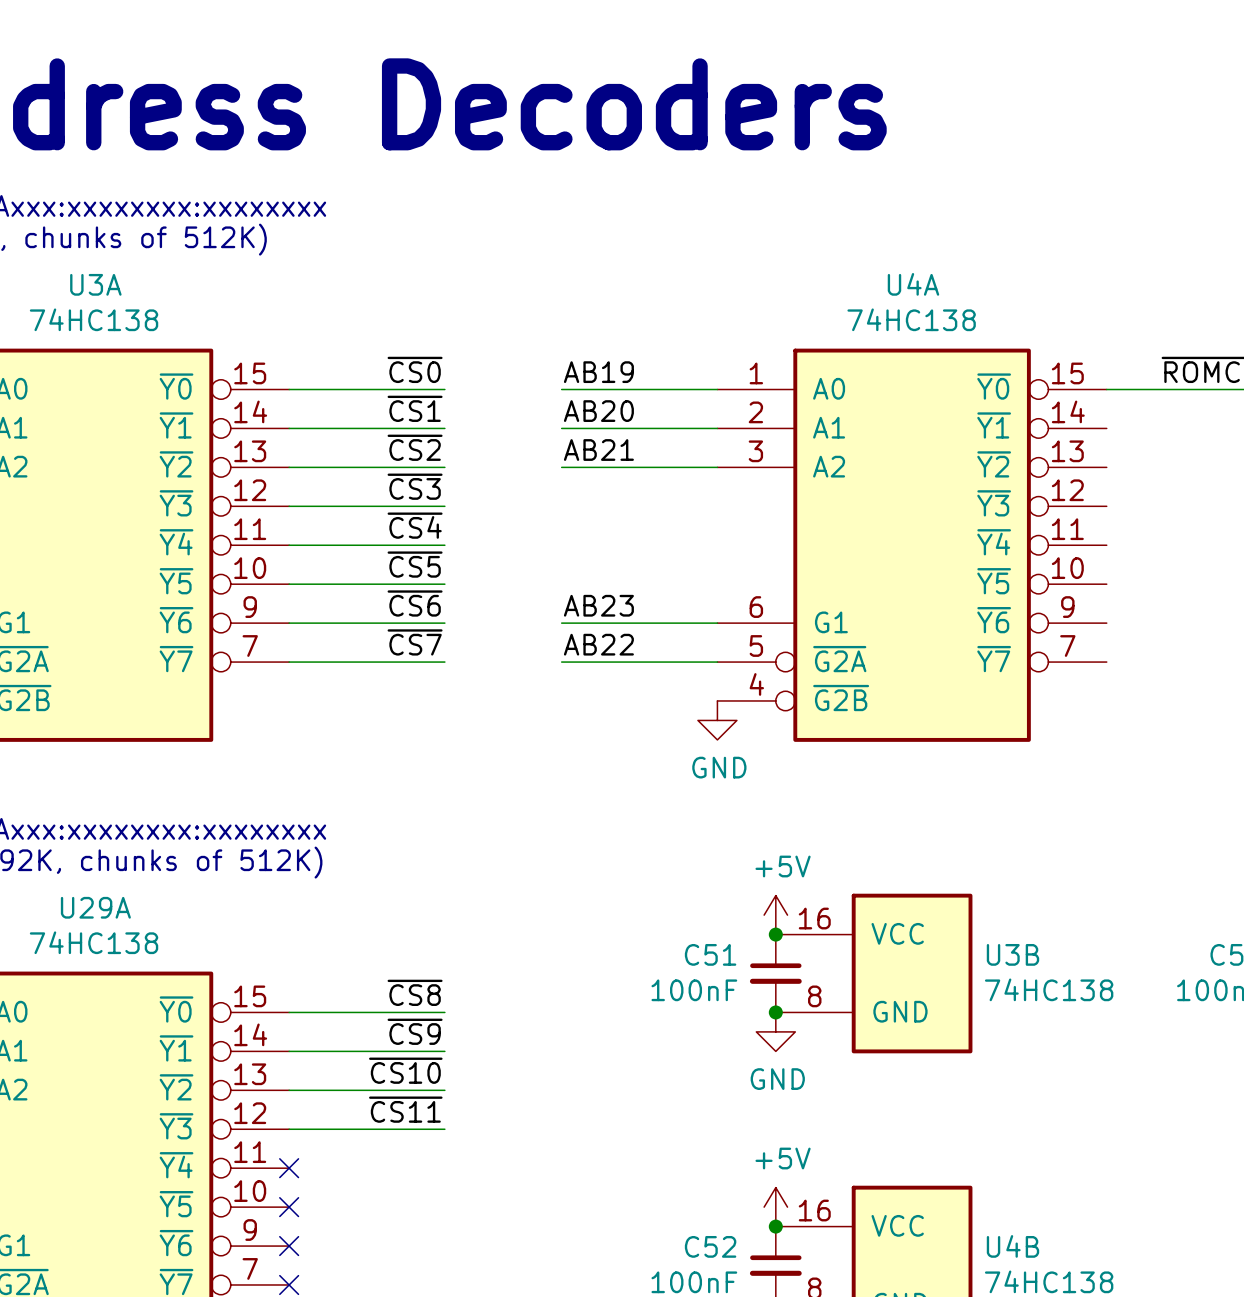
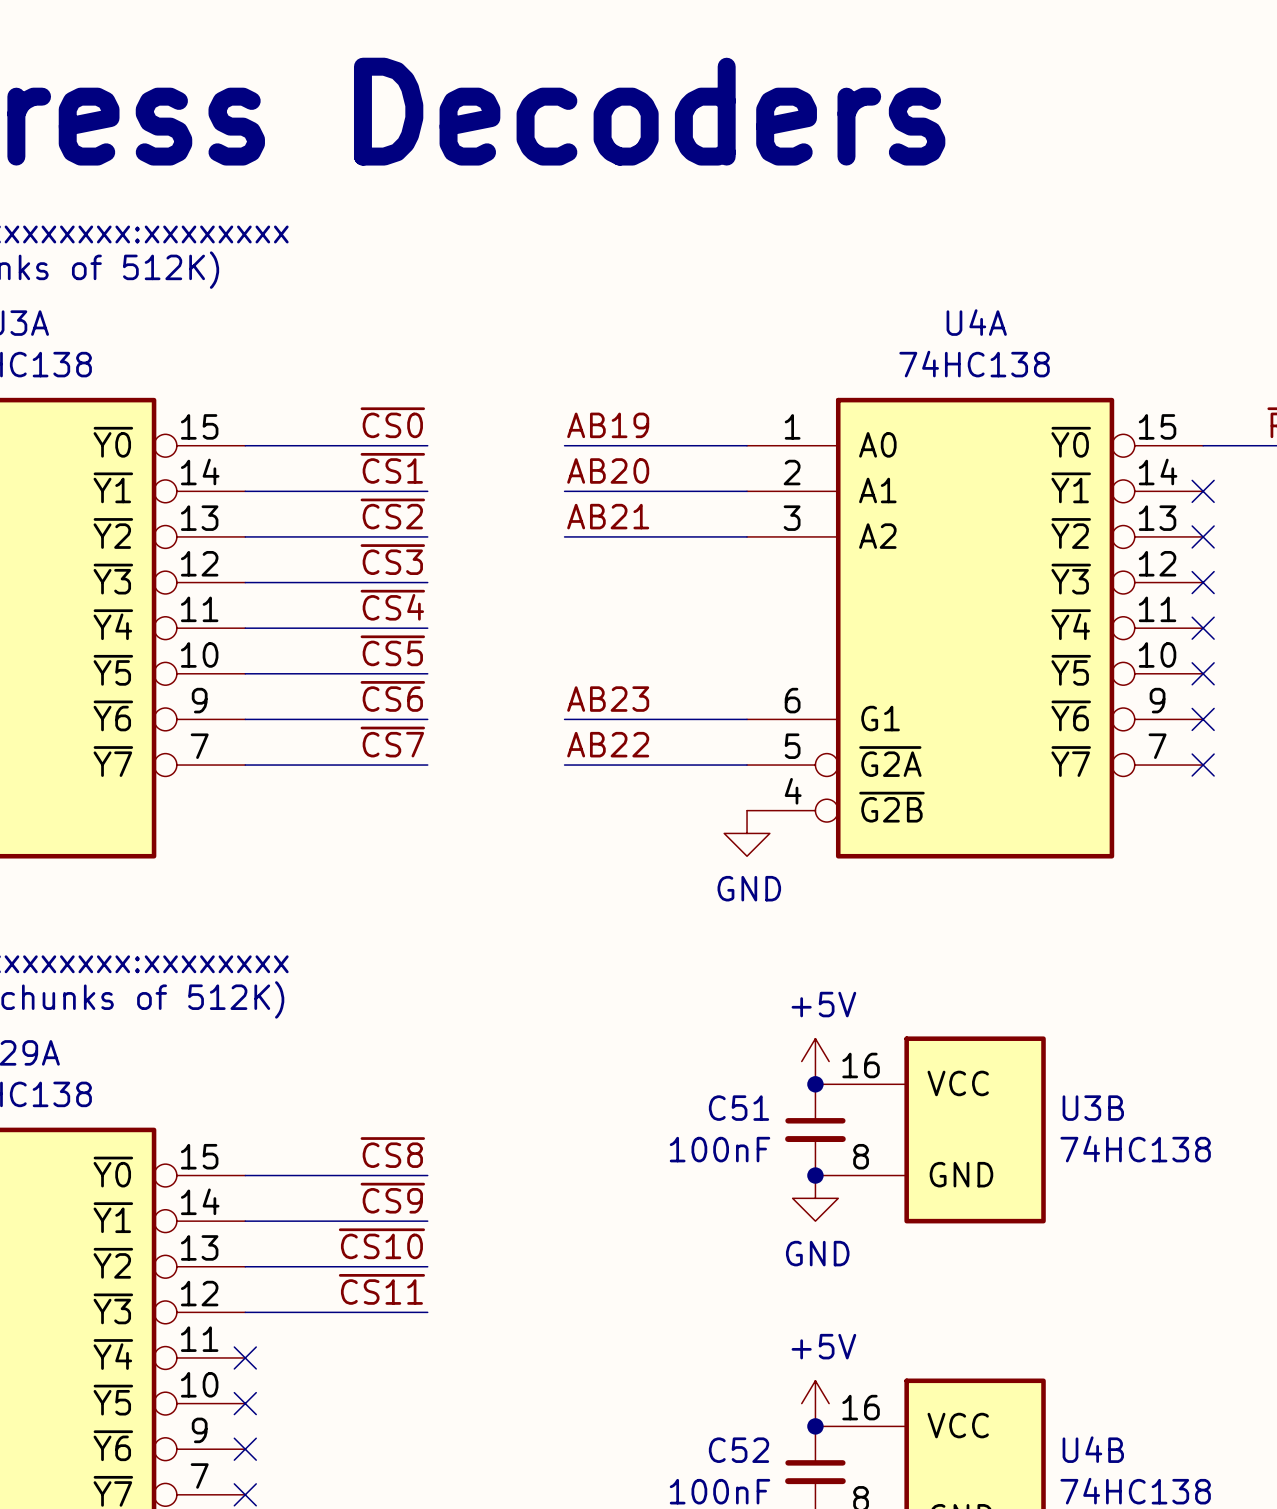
no-connect mark: none -> (1203, 491)
no-connect mark: none -> (1203, 536)
no-connect mark: none -> (1203, 582)
no-connect mark: none -> (1203, 628)
no-connect mark: none -> (1203, 673)
no-connect mark: none -> (1203, 719)
no-connect mark: none -> (1203, 765)

